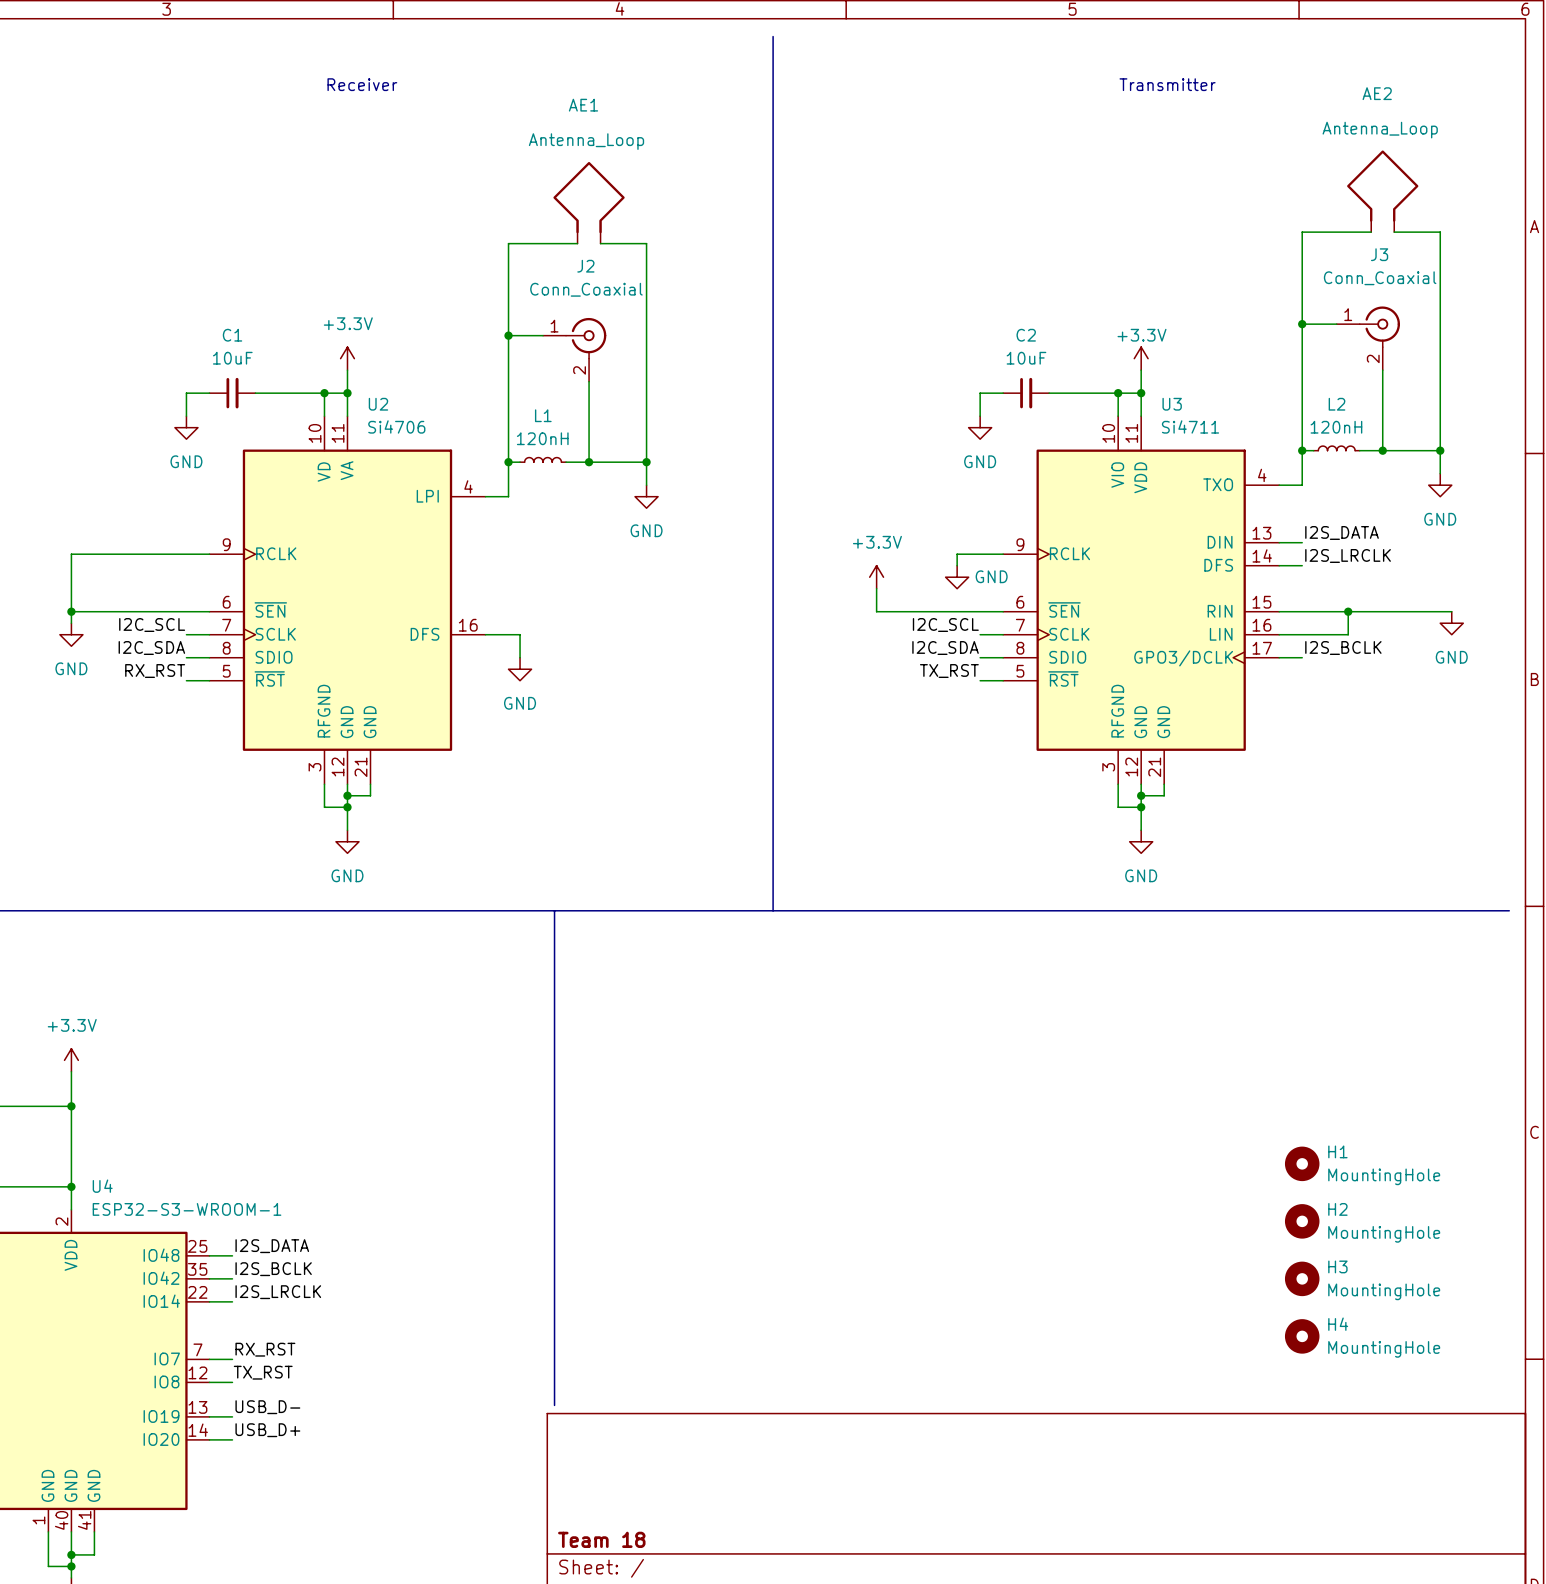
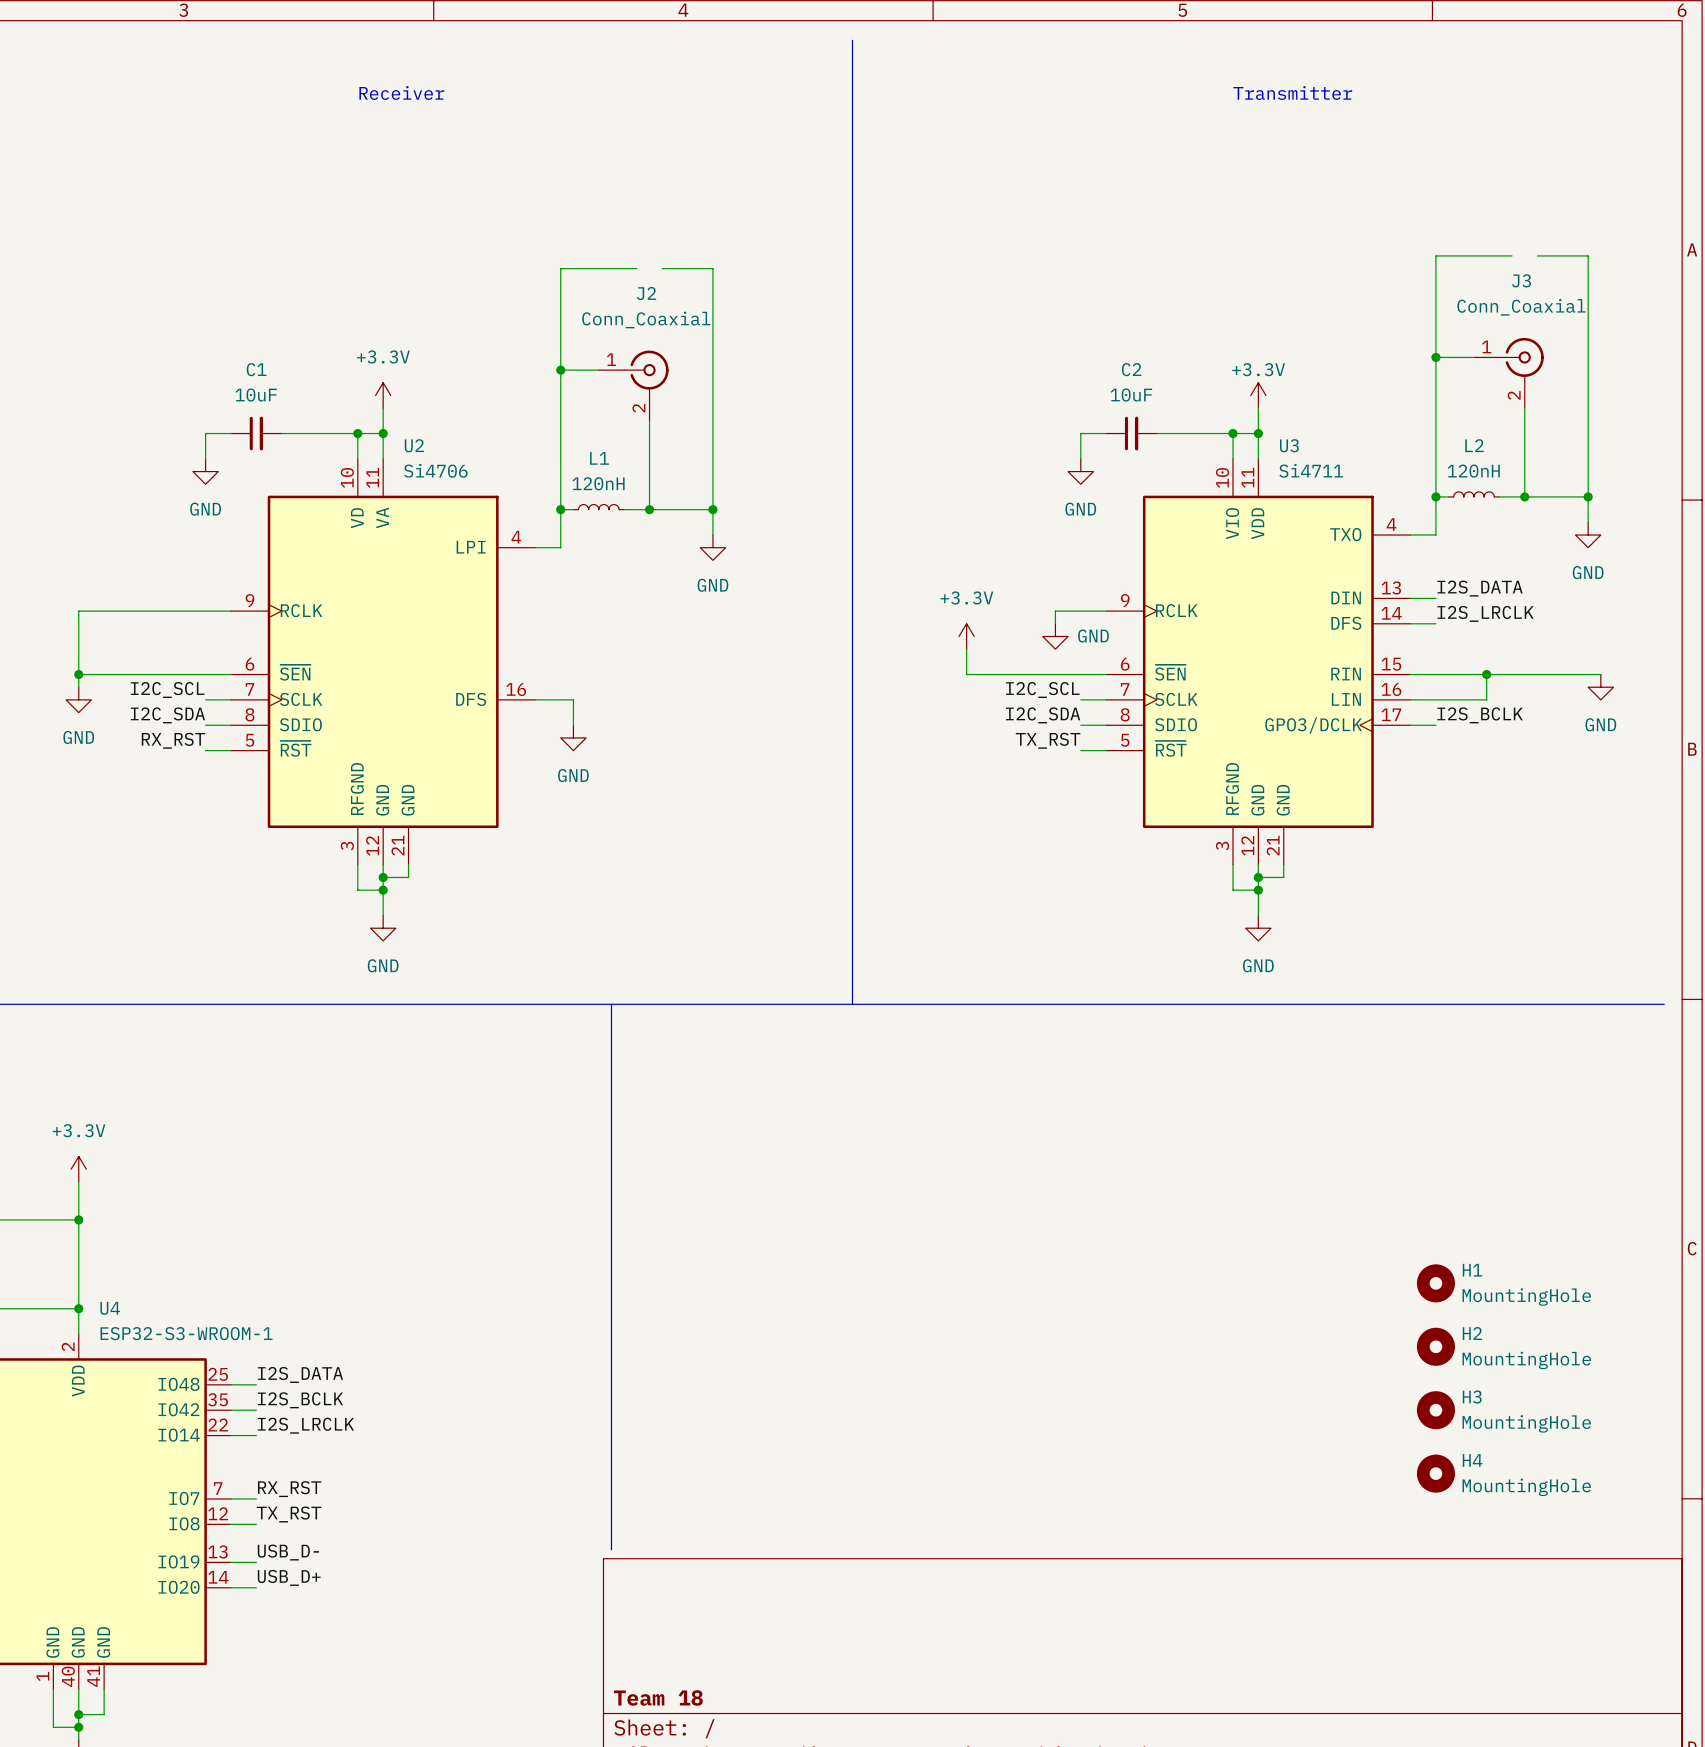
AE2: Antenna_Loop (1382, 191) -> none
AE1: Antenna_Loop (589, 202) -> none

